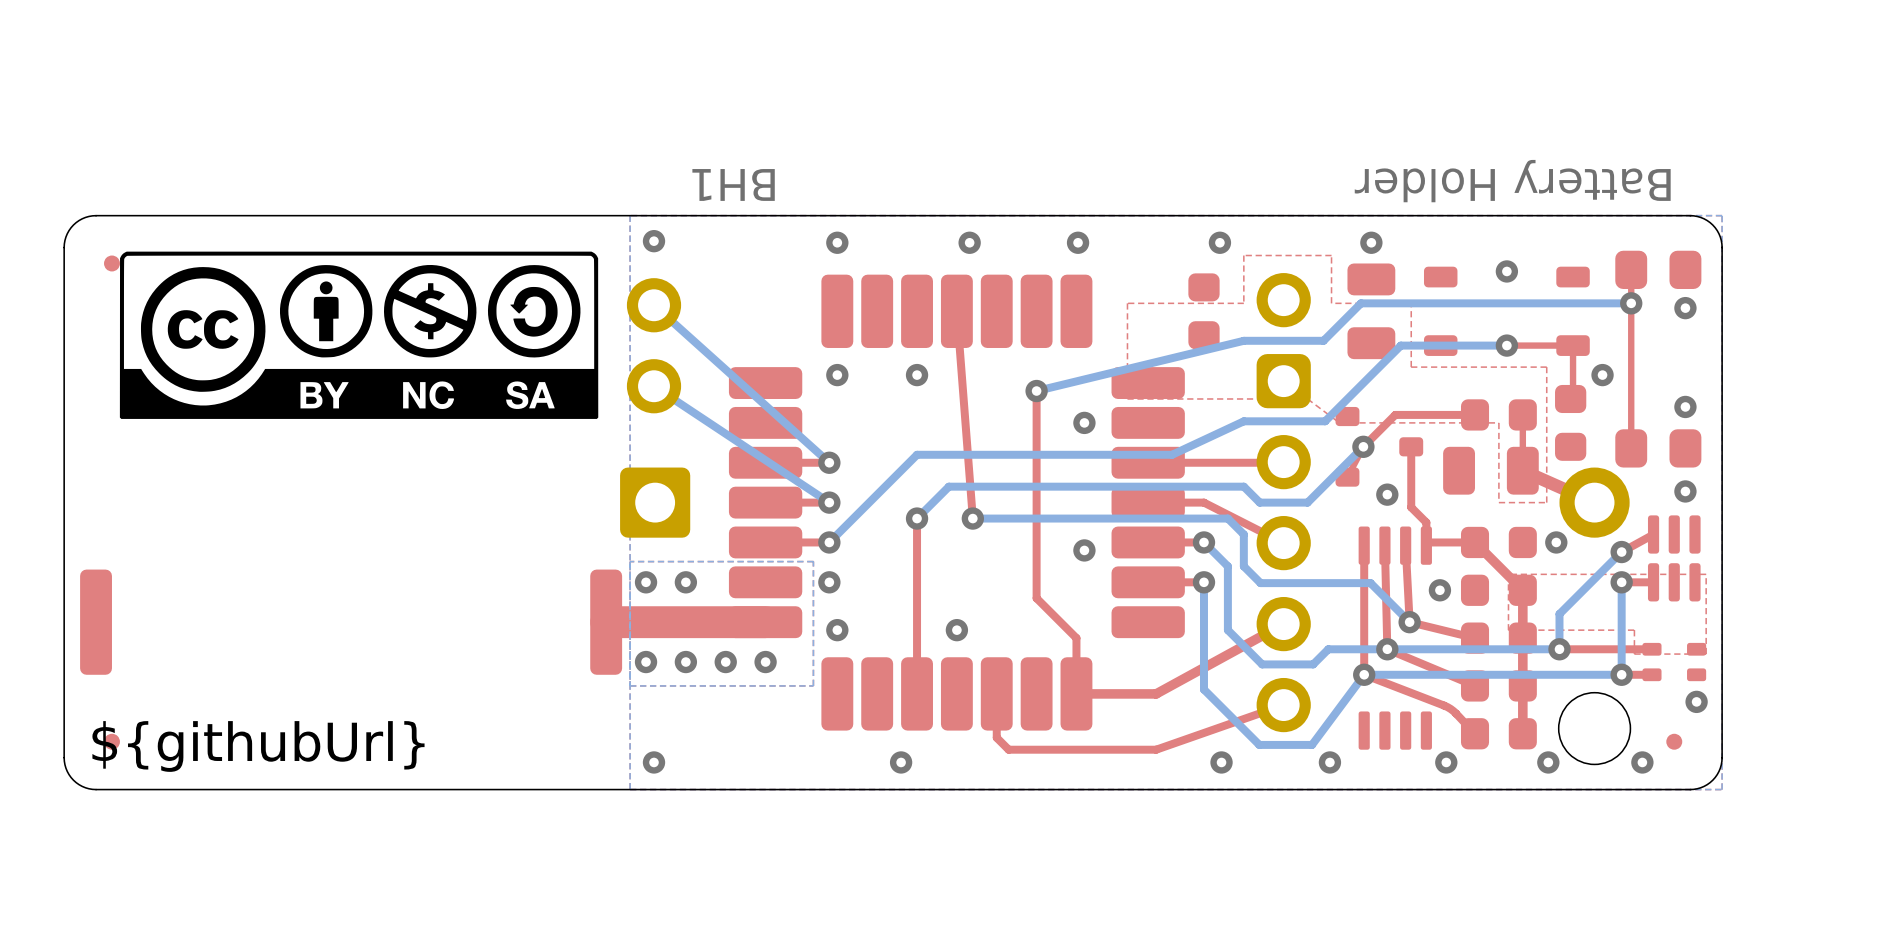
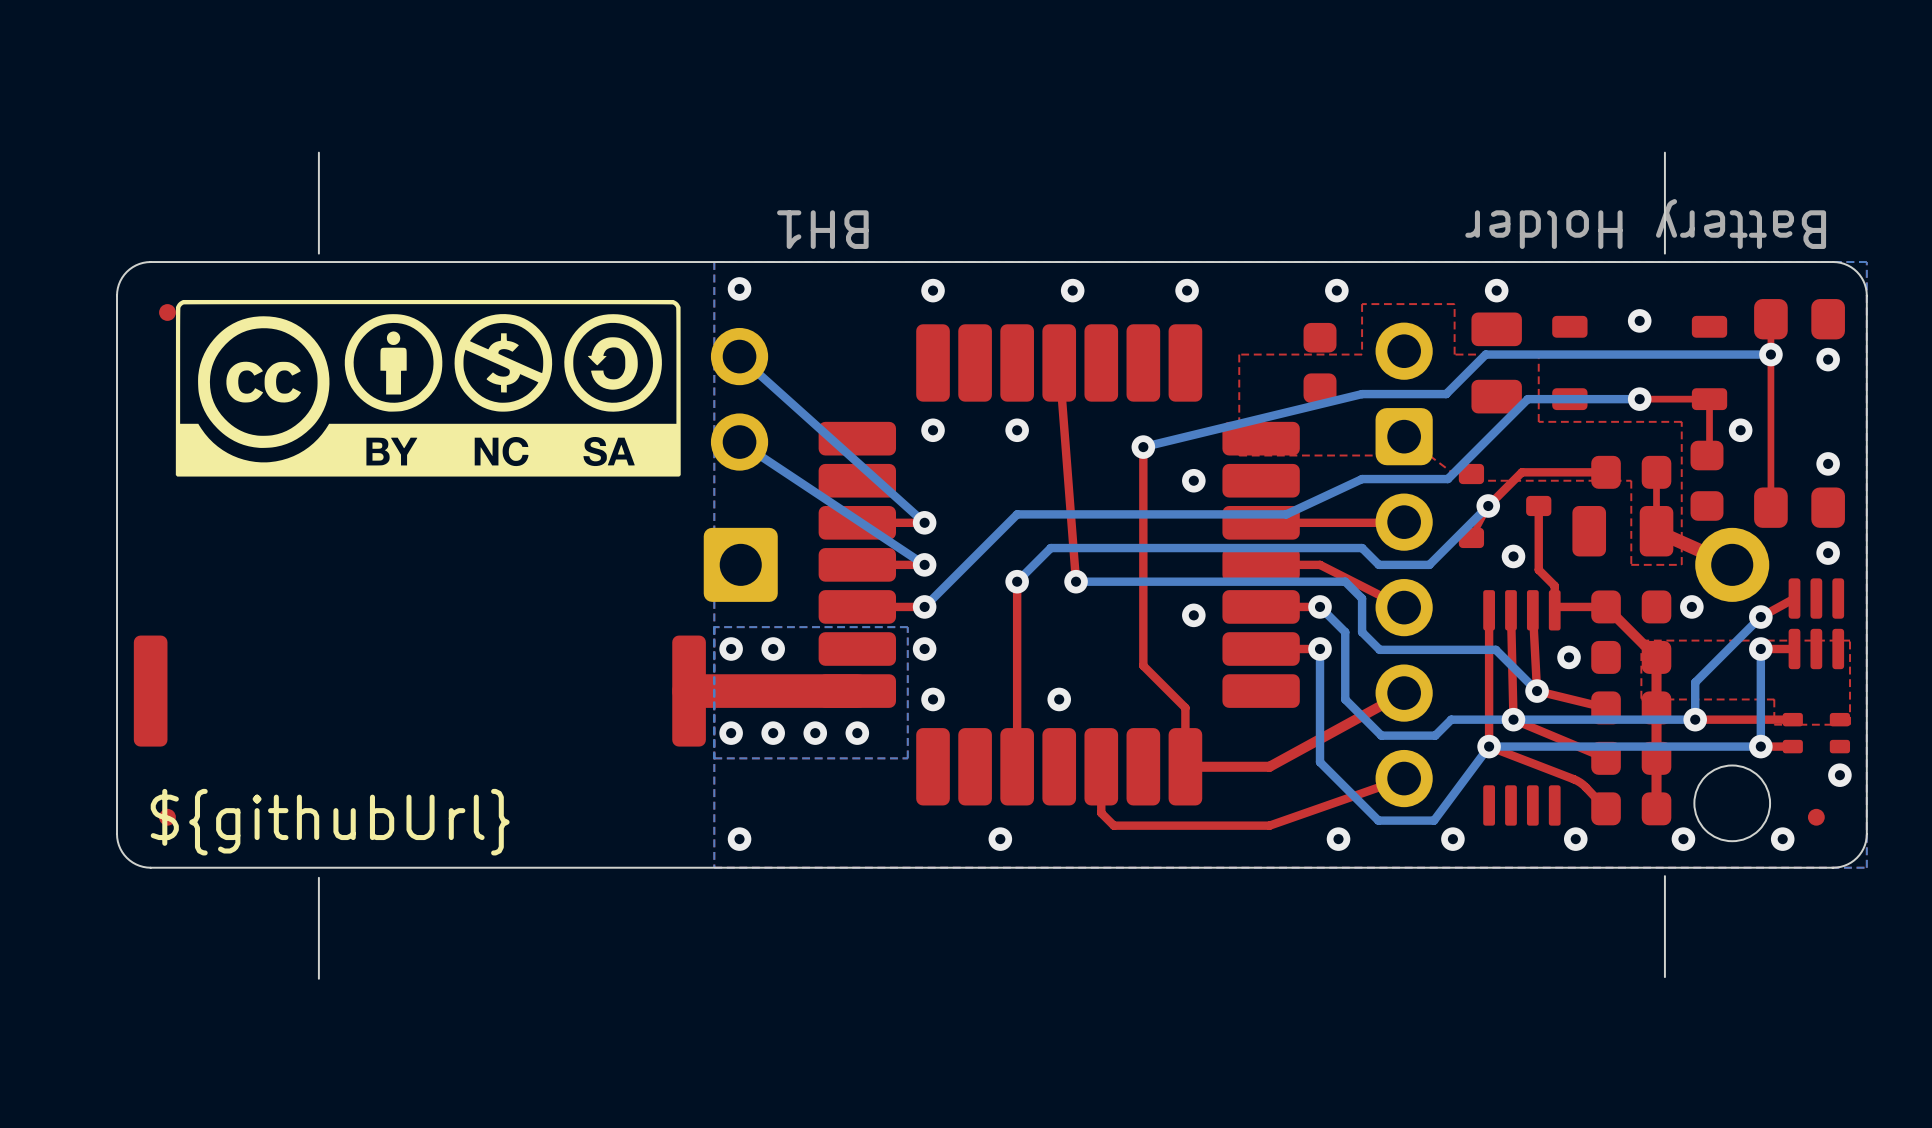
board edge: none -> (318, 152) (318, 253)
board edge: none -> (1664, 152) (1664, 253)
board edge: none -> (1664, 876) (1664, 977)
board edge: none -> (318, 877) (318, 978)

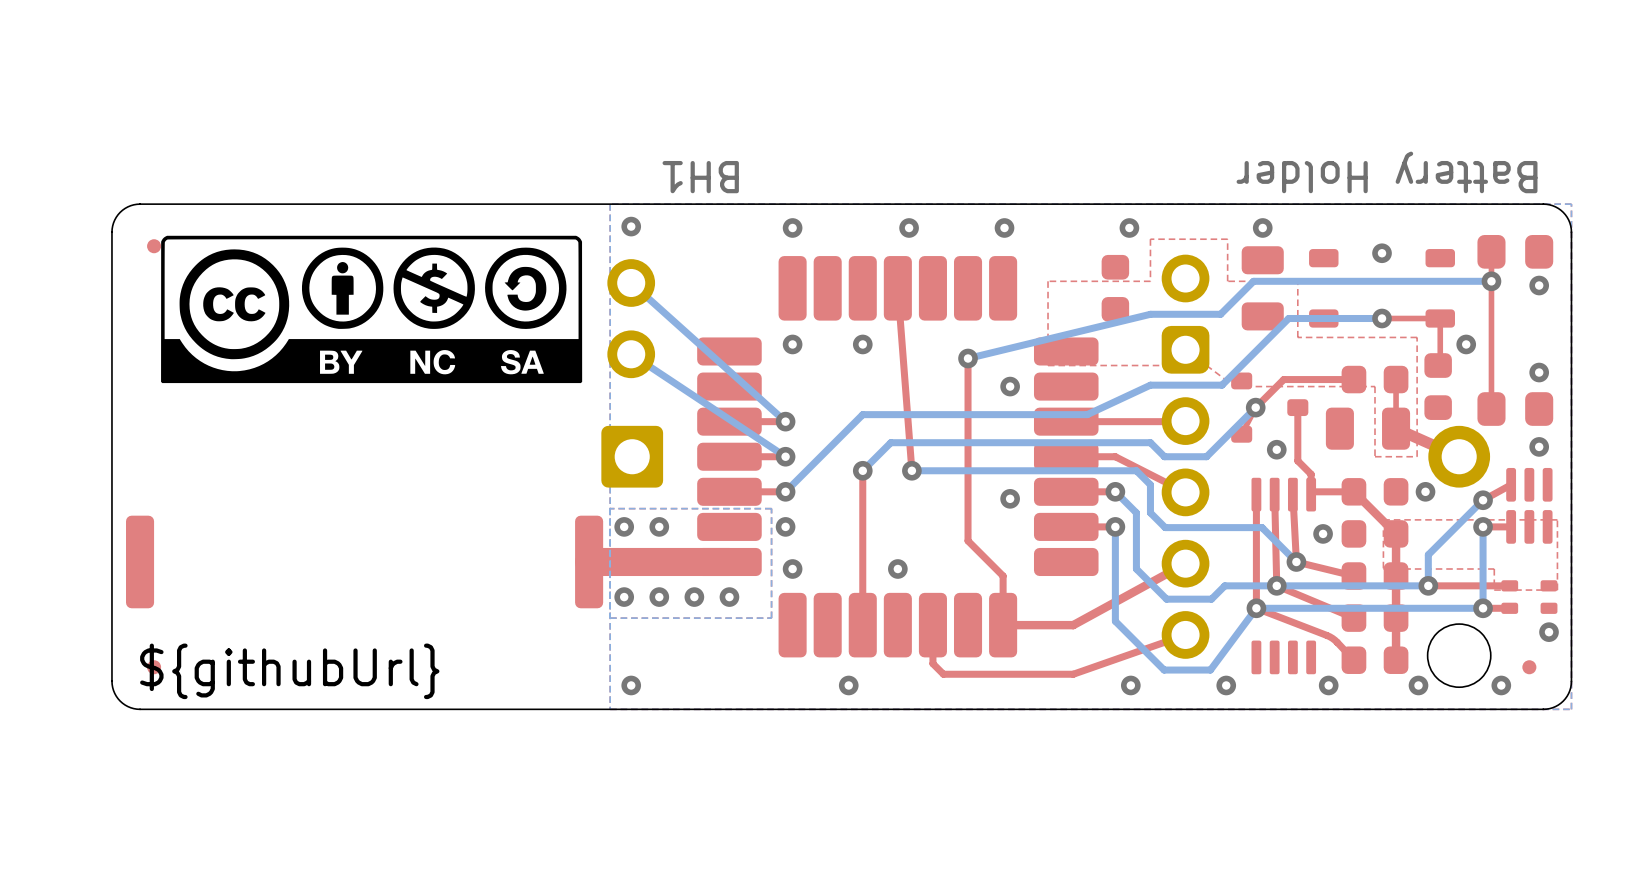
board edge: (318, 152) (318, 253) -> none
board edge: (1664, 152) (1664, 253) -> none
board edge: (1664, 876) (1664, 977) -> none
board edge: (318, 877) (318, 978) -> none

